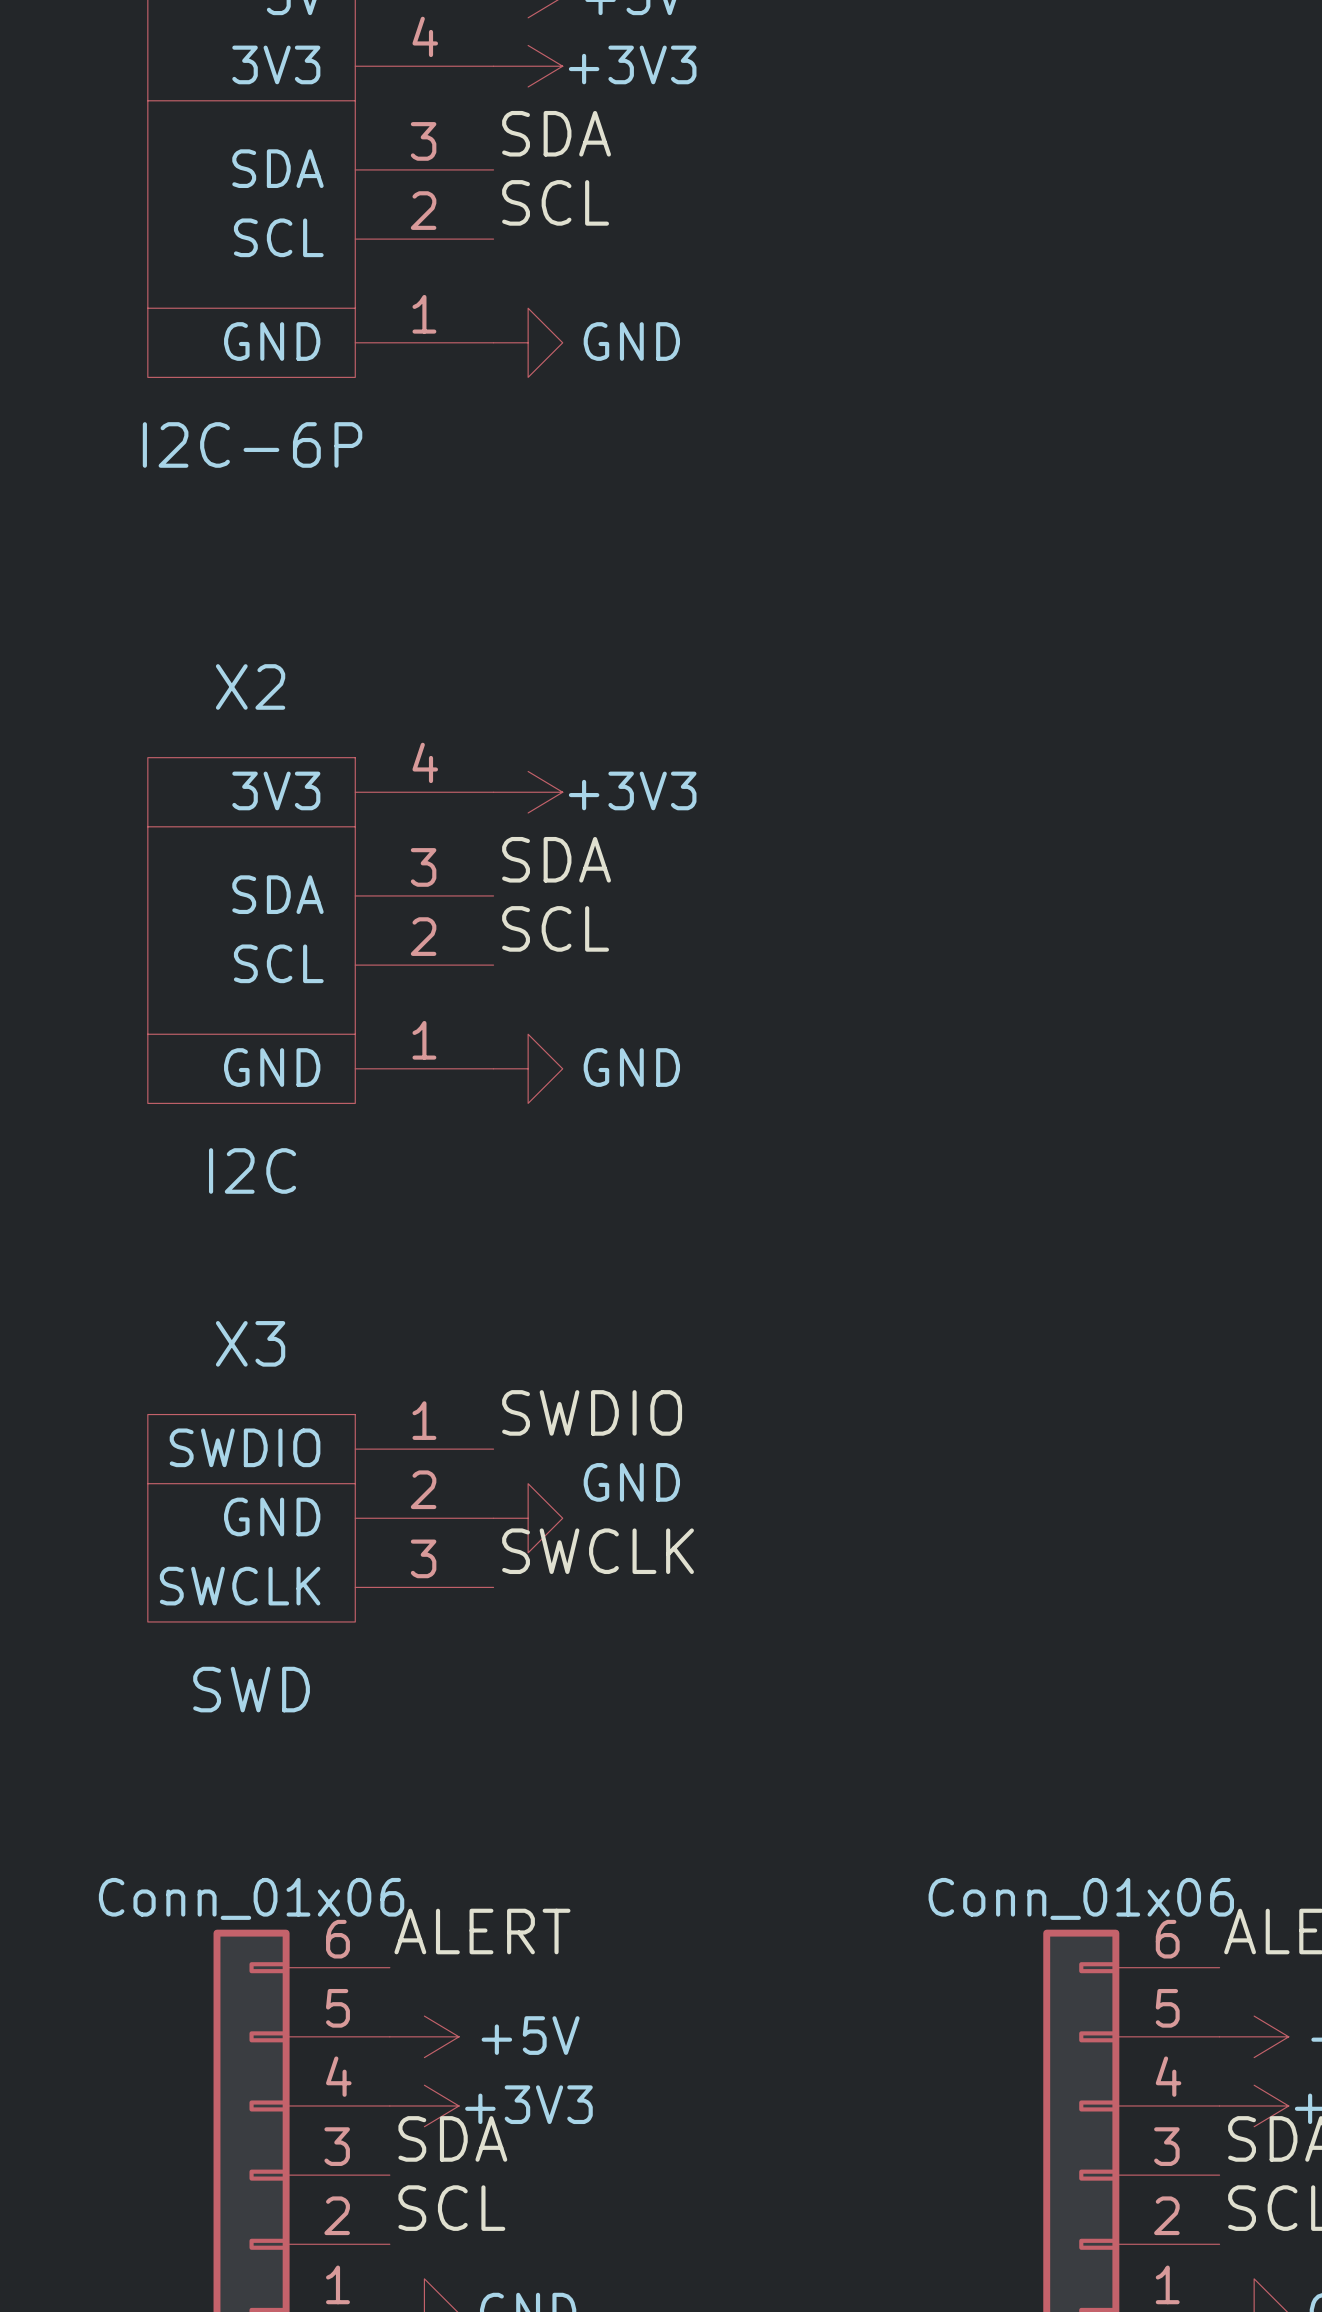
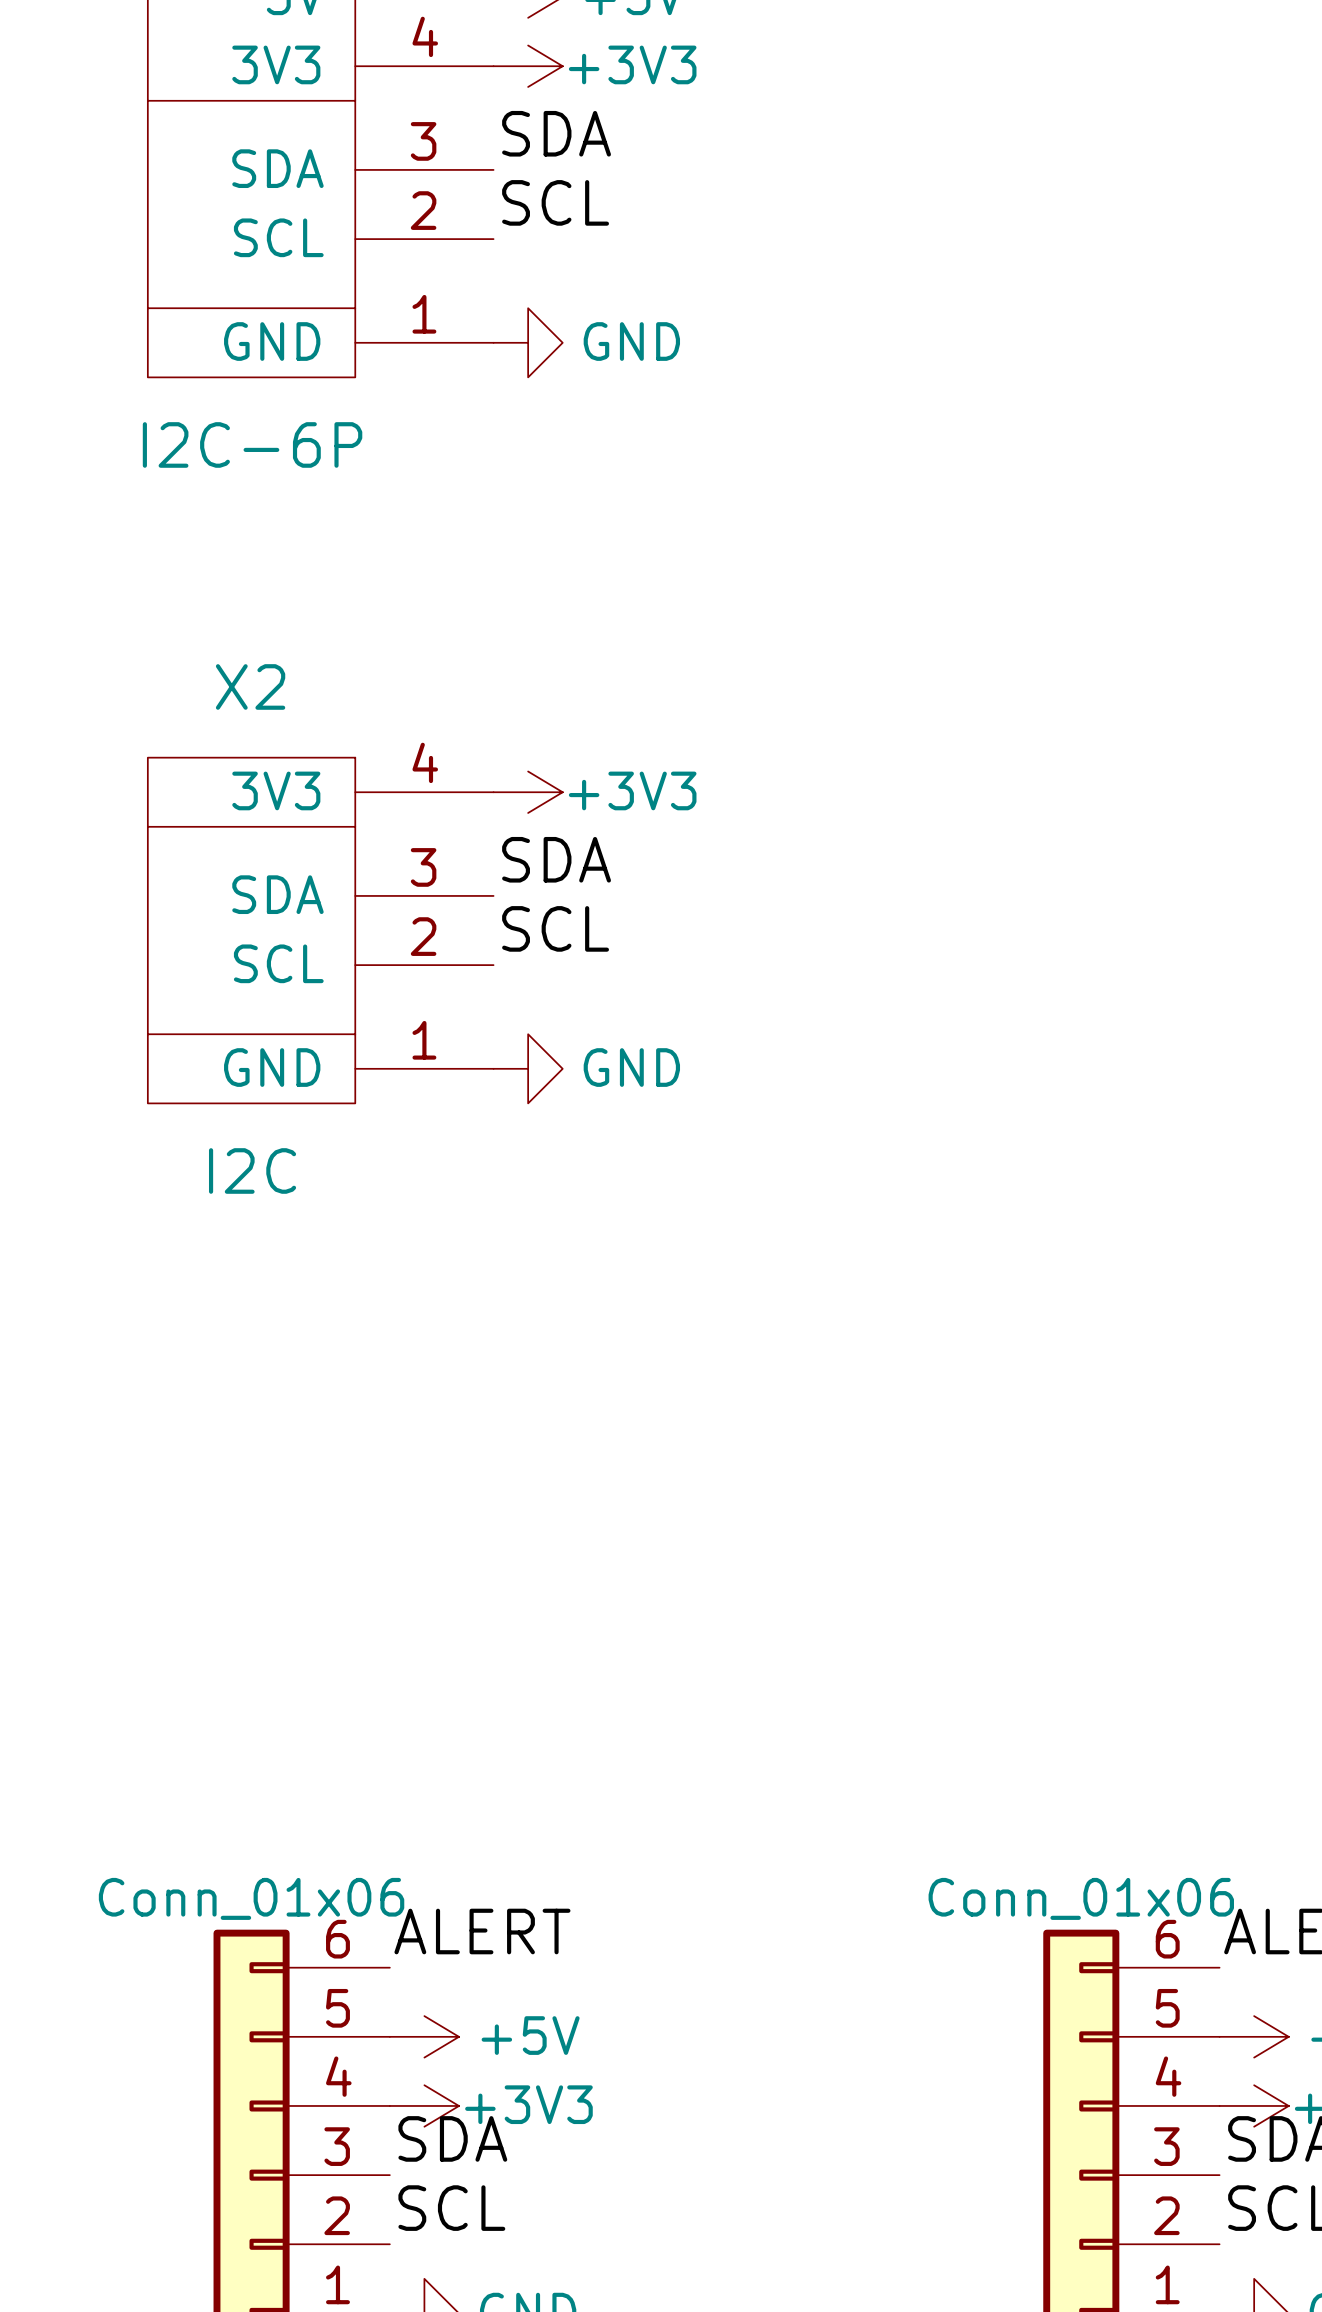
label: SWDIO (592, 1412) -> none
X3: SWD (320, 1518) -> none
power symbol: GND (528, 1518) -> none
label: SWCLK (598, 1551) -> none

